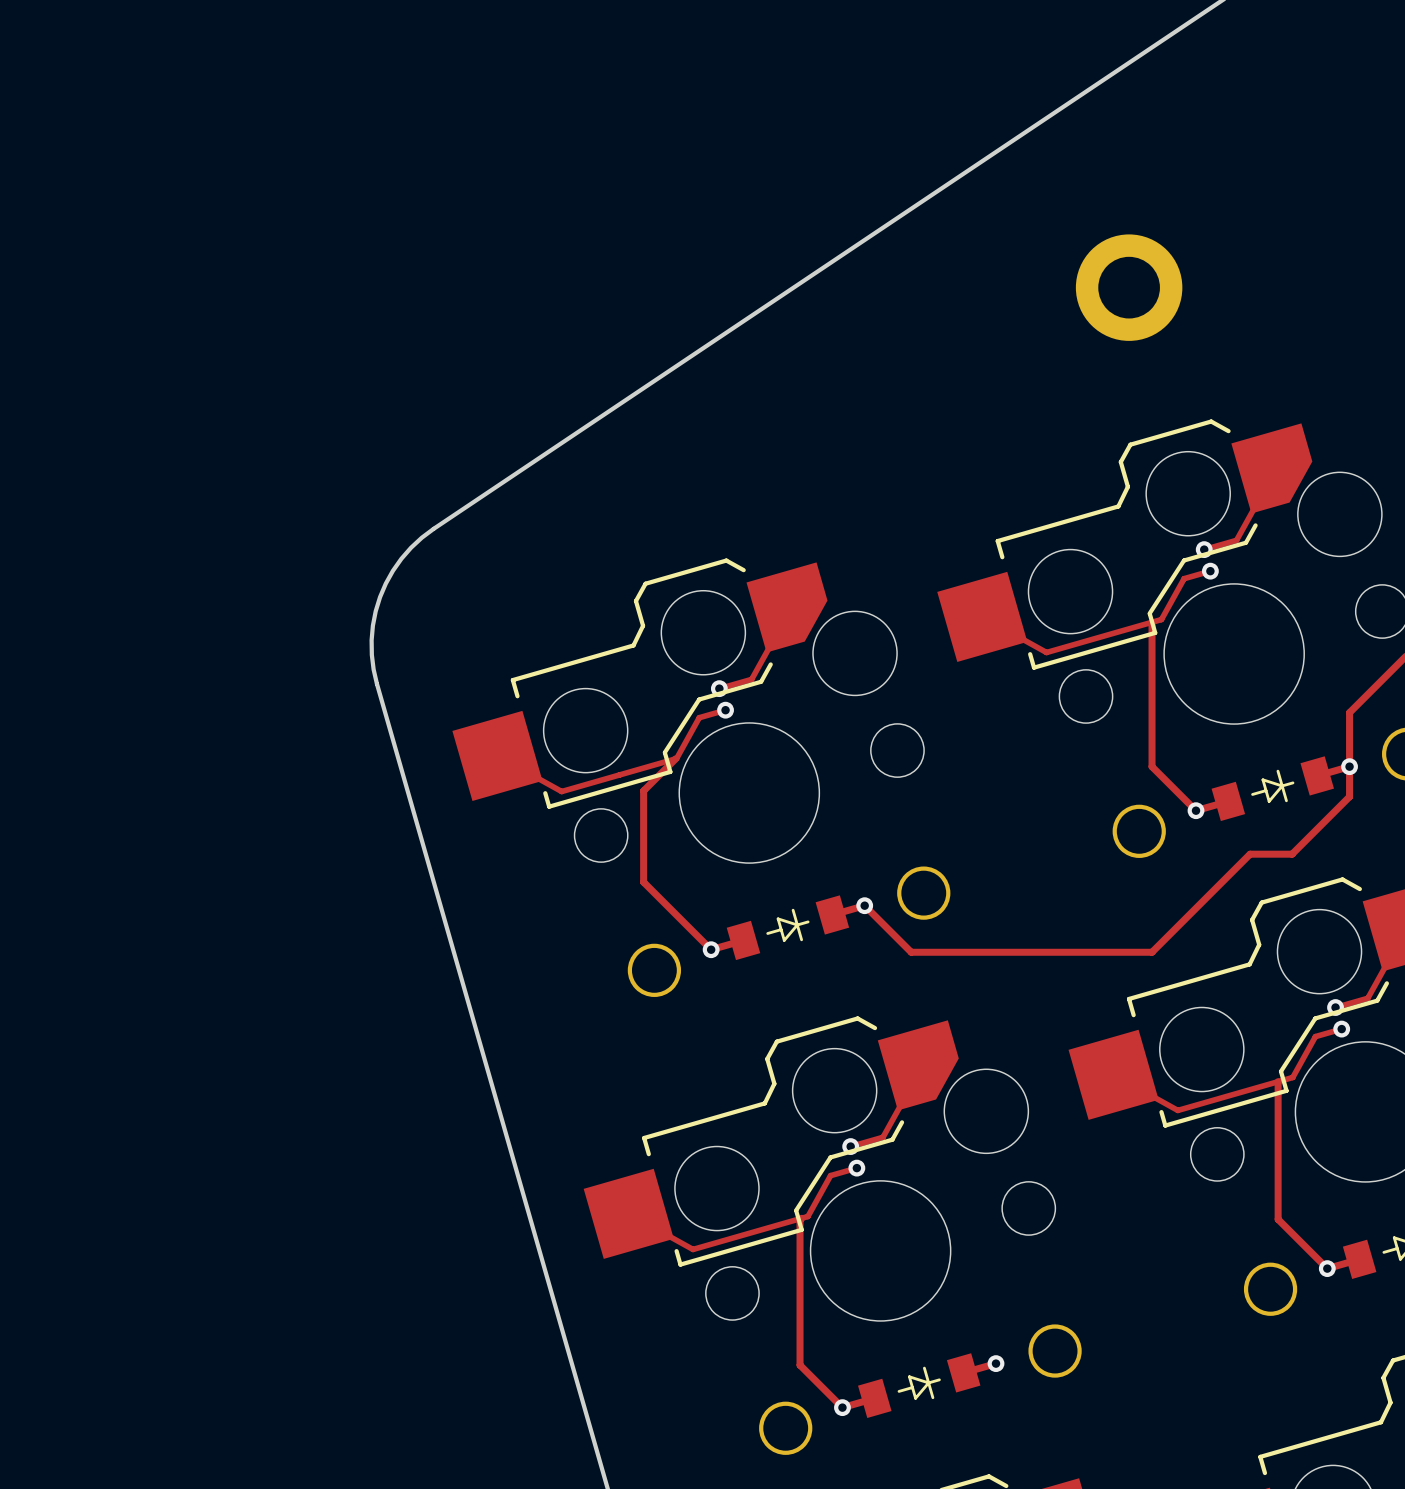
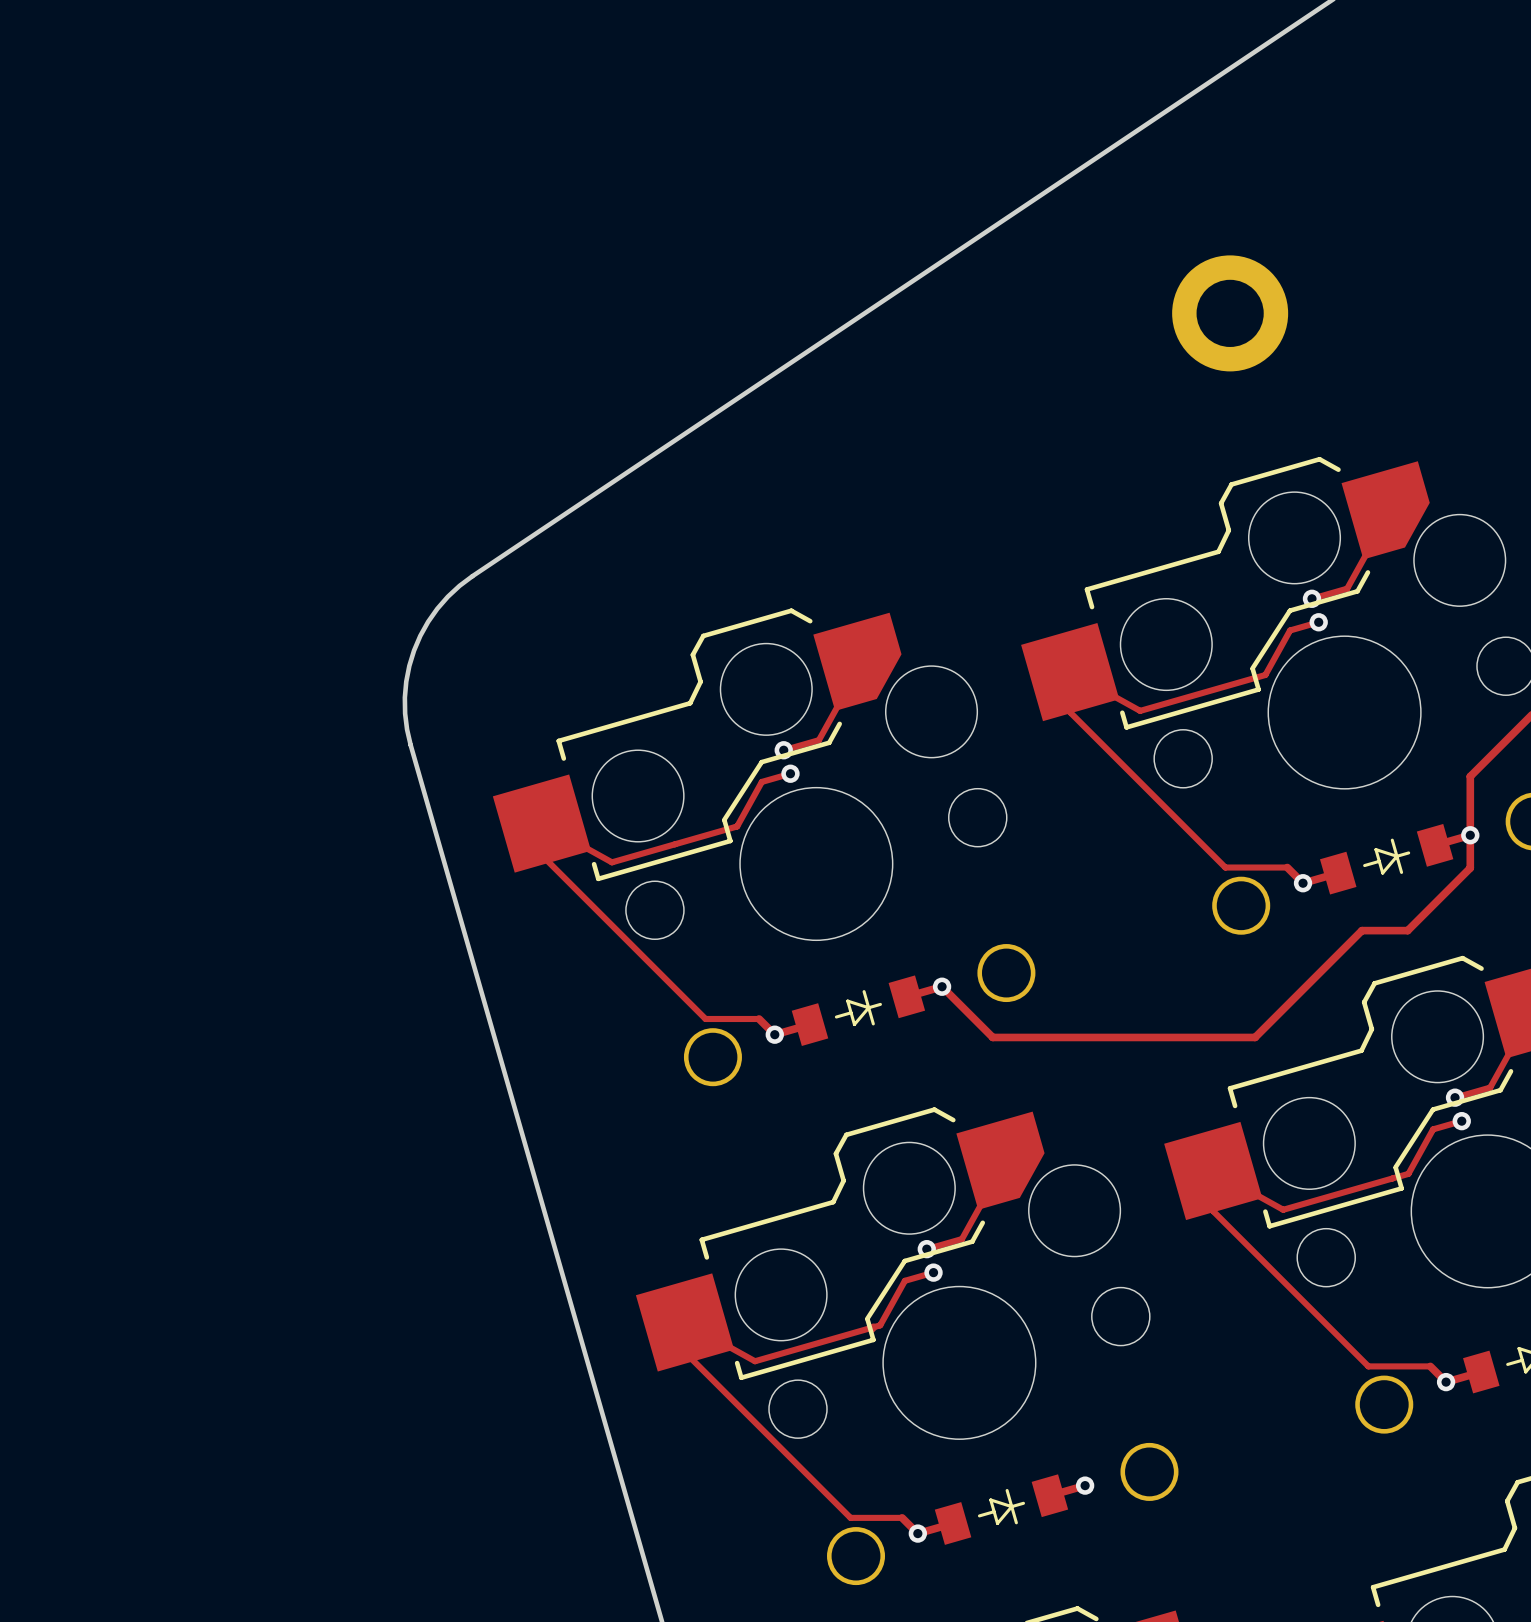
track: (1152, 622) (1152, 766) (1181, 796) -> (1070, 672) (1070, 712) (1225, 867) (1287, 867)
track: (675, 758) (643, 790) (643, 882) (696, 935) -> (541, 823) (541, 855) (705, 1018) (759, 1018)
track: (1278, 1081) (1278, 1219) (1312, 1254) -> (1213, 1170) (1213, 1211) (1368, 1366) (1430, 1366)
track: (800, 1220) (800, 1365) (828, 1393) -> (685, 1322) (685, 1352) (850, 1517) (902, 1517)

